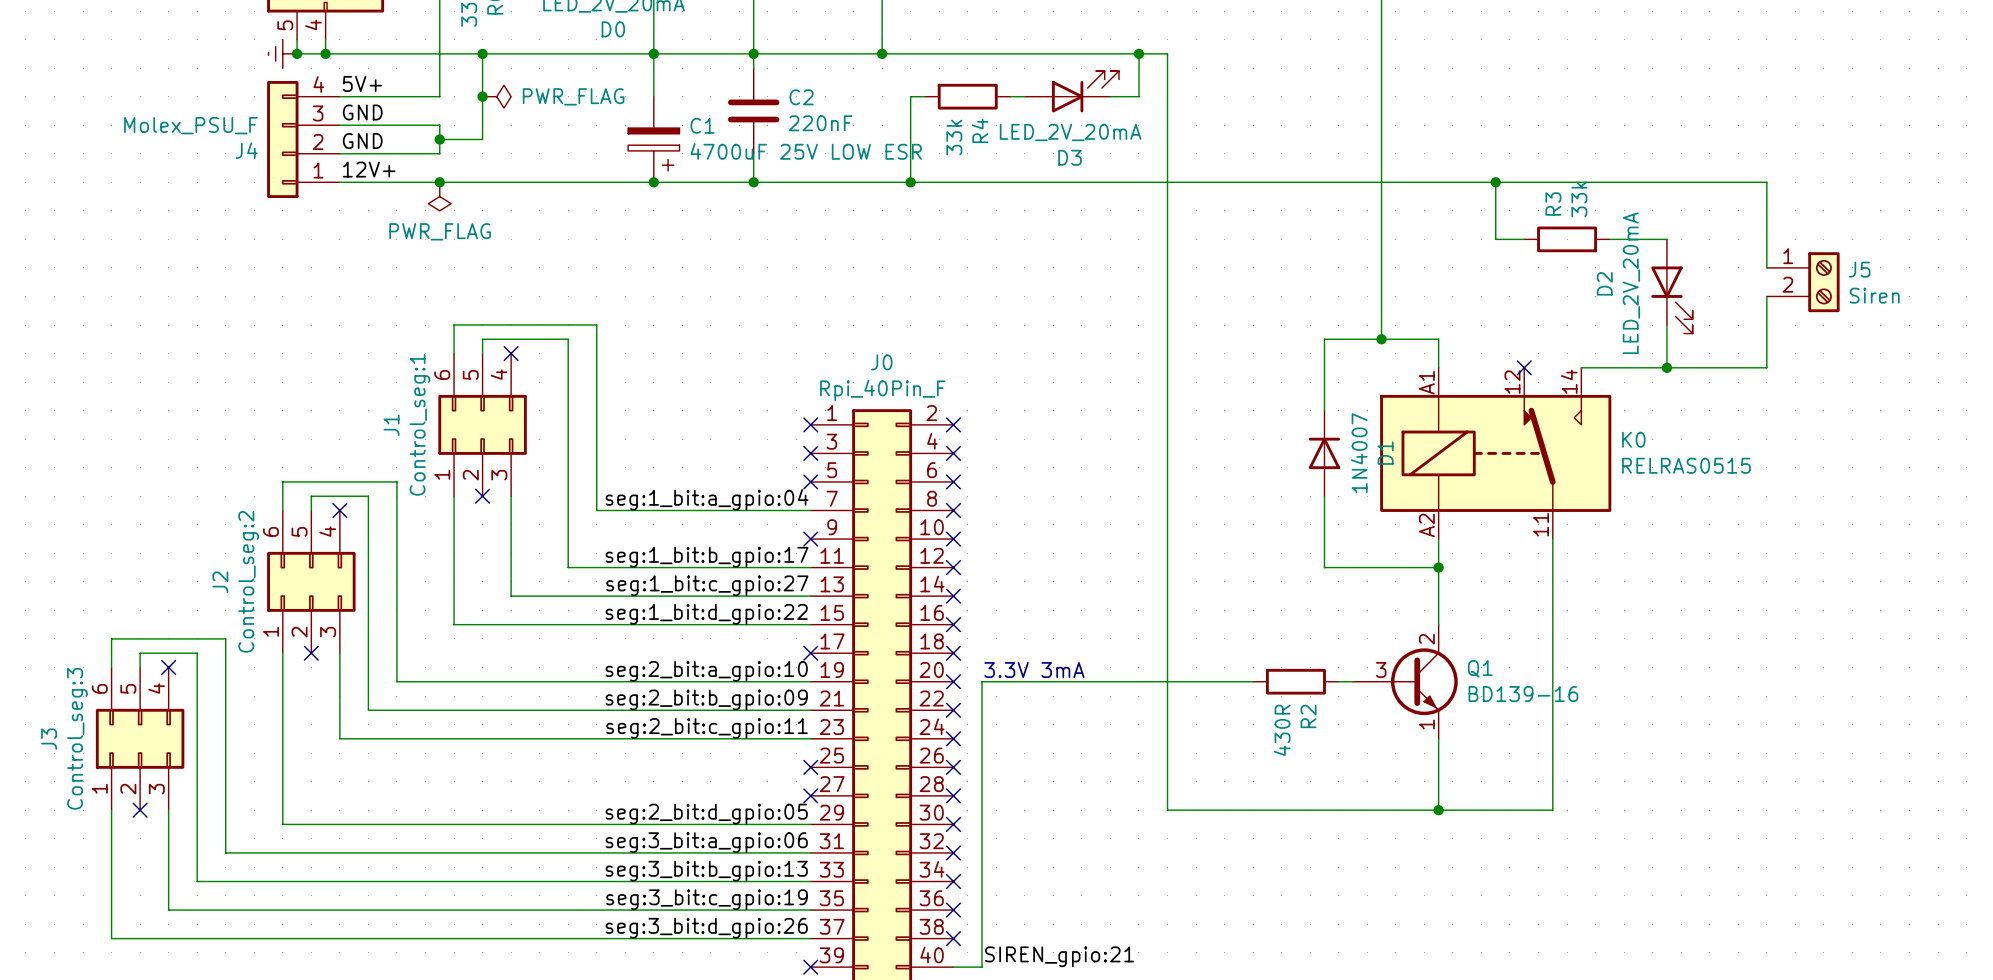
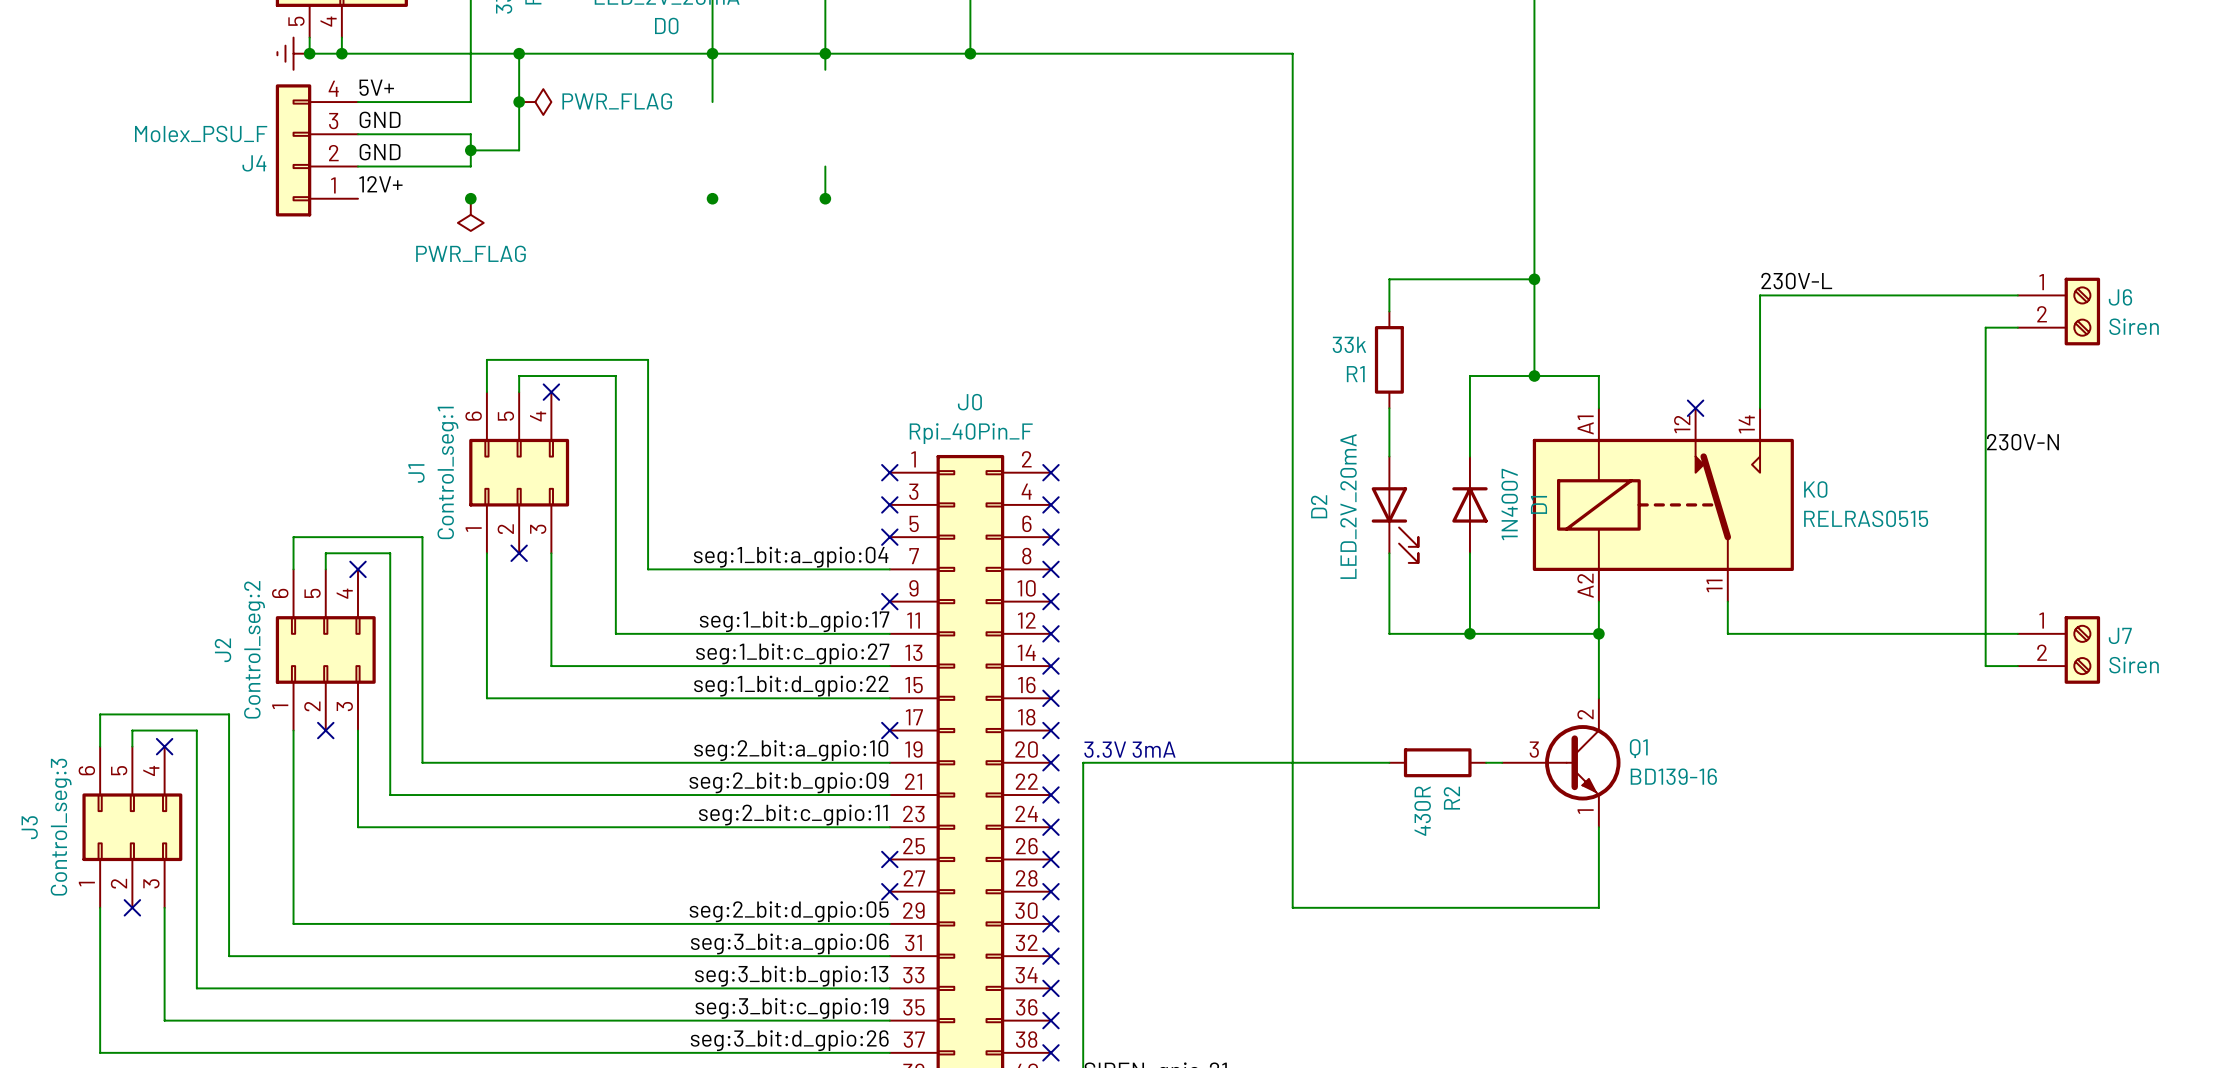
wire: (1138, 53) (1138, 96) (1110, 96) -> none
junction: (1138, 53) -> none
D3: LED_2V_20mA (1071, 91) -> none
wire: (924, 96) (910, 96) (910, 182) -> none
R4: 33k (967, 96) -> none
wire: (1010, 96) (1024, 96) -> none
C2: 220nF (753, 110) -> none
C1: 4700uF 25V LOW ESR (653, 139) -> none
wire: (339, 182) (1766, 182) (1766, 267) -> none
junction: (910, 182) -> none
wire: (1495, 182) (1495, 239) (1524, 239) -> none
junction: (1495, 182) -> none
R3: 33k (1567, 239) -> none
wire: (1609, 239) (1666, 239) -> none
wire: none -> (1534, 279) (1389, 279) (1389, 311)
junction: none -> (1534, 279)
label: none -> 230V-L (1796, 281)
J5: Siren (1803, 282) -> none
J6: none -> Siren (2058, 311)
D2 position: (1671, 286) -> (1395, 509)
wire: (1766, 296) (1766, 367) (1581, 367) -> (2017, 295) (1760, 295) (1760, 408)
wire: none -> (2017, 327) (1985, 327) (1985, 666) (2017, 666)
R1: none -> 33k (1389, 359)
wire: (1666, 325) (1666, 367) -> none
wire: none -> (1389, 408) (1389, 456)
junction: (1666, 367) -> none
label: none -> 230V-N (2022, 442)
wire: none -> (1389, 553) (1389, 633) (1469, 633)
junction: none -> (1469, 633)
wire: (1552, 567) (1552, 810) (1438, 810) -> (1727, 633) (2017, 633)
J7: none -> Siren (2058, 649)
junction: (1438, 810) -> none

